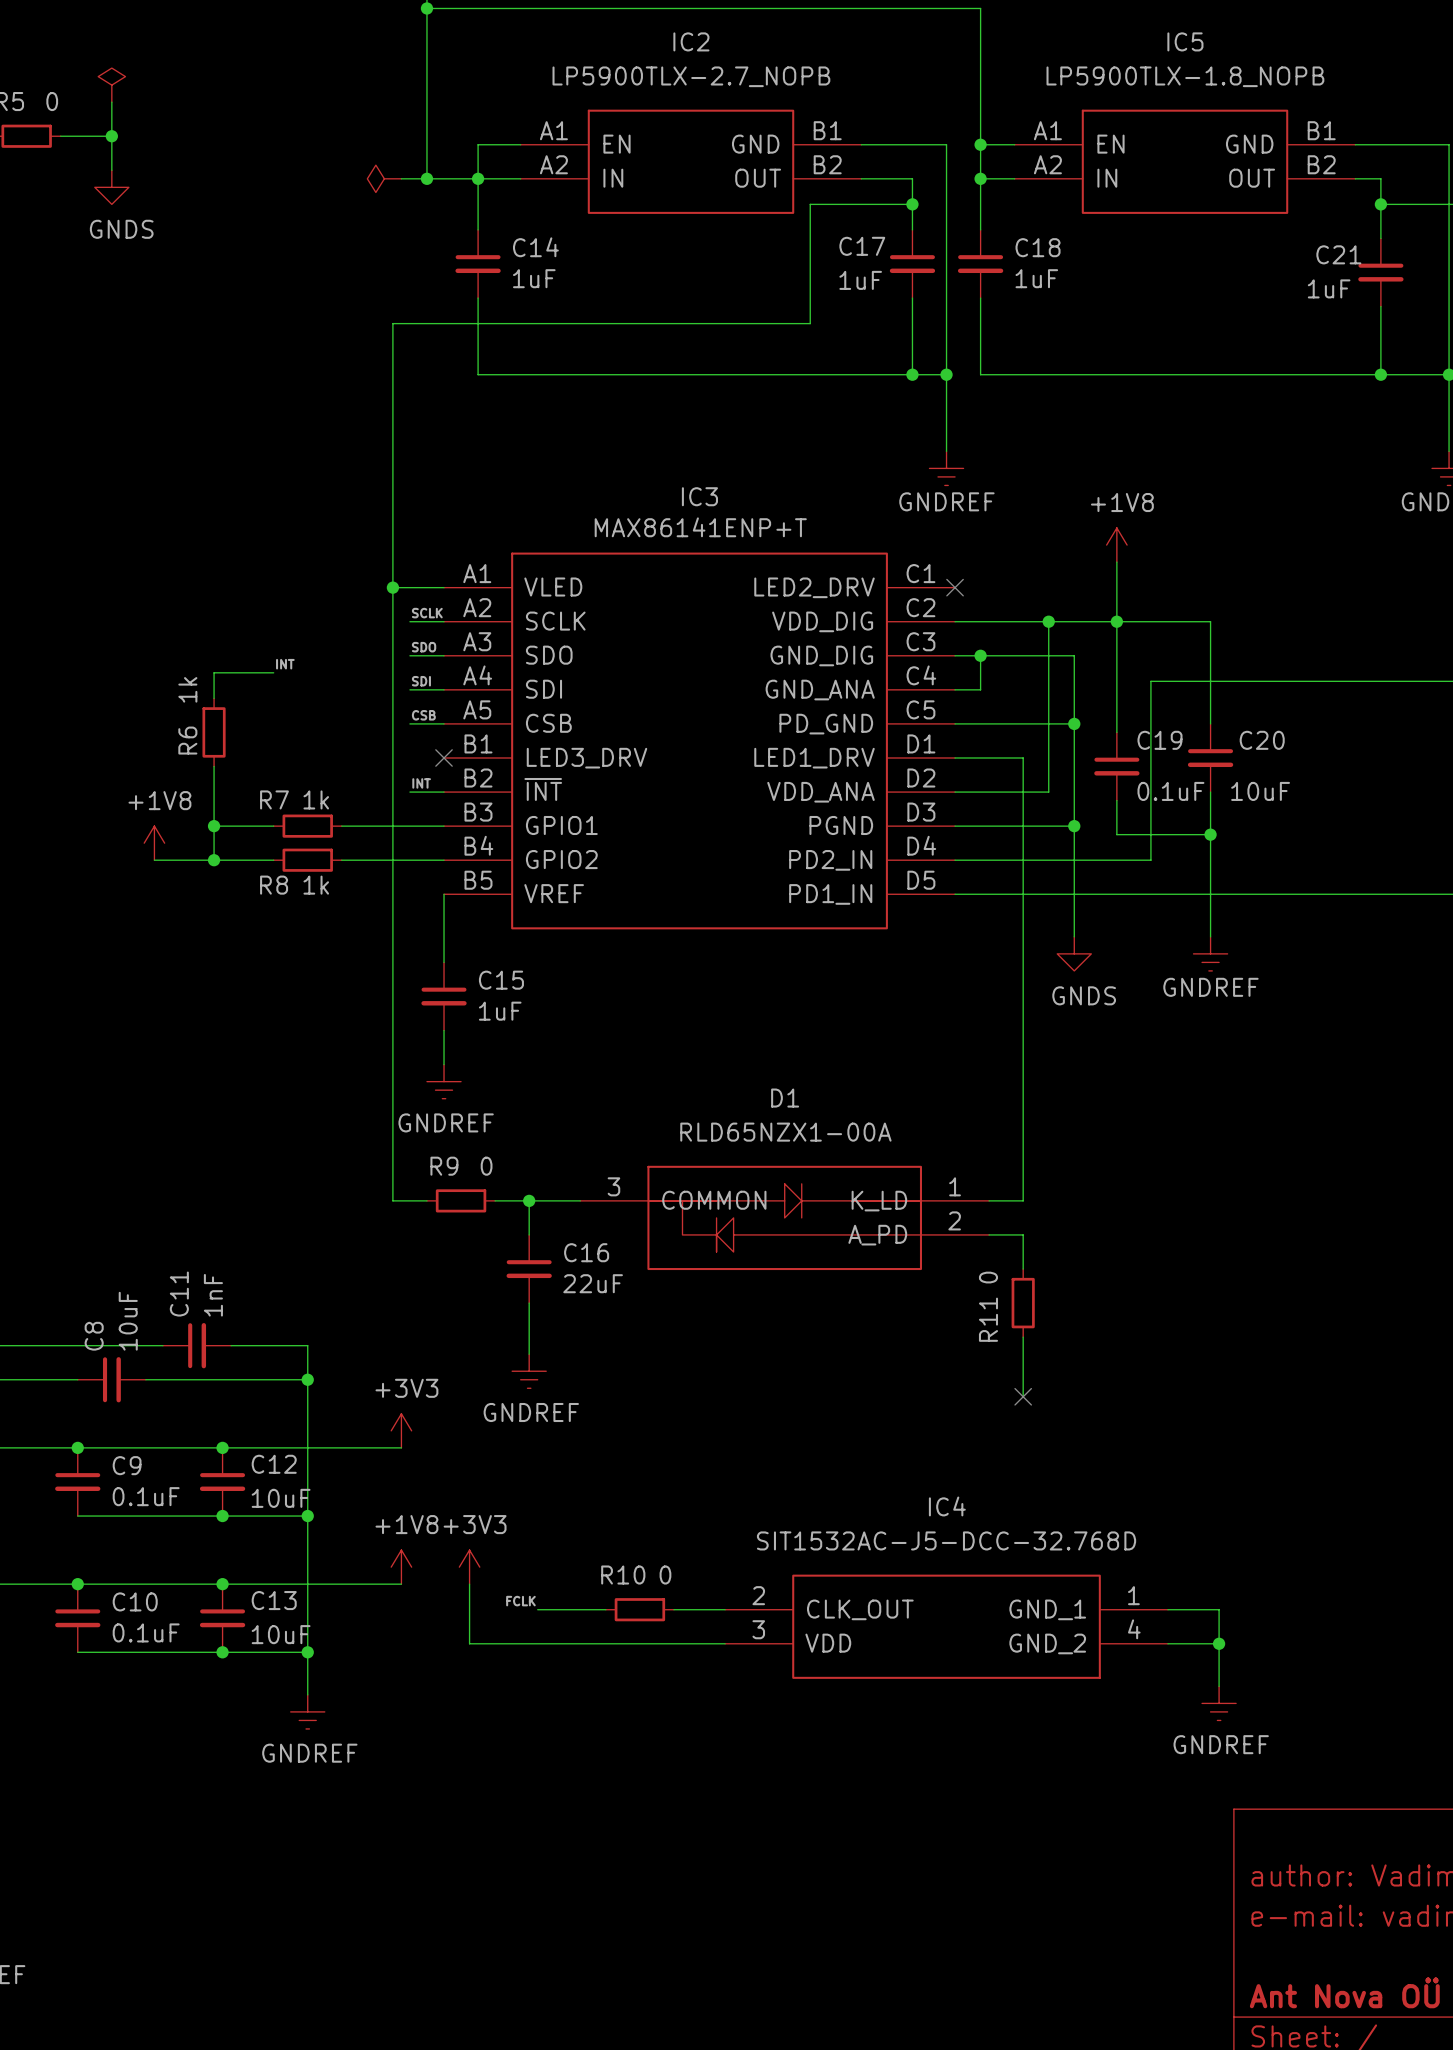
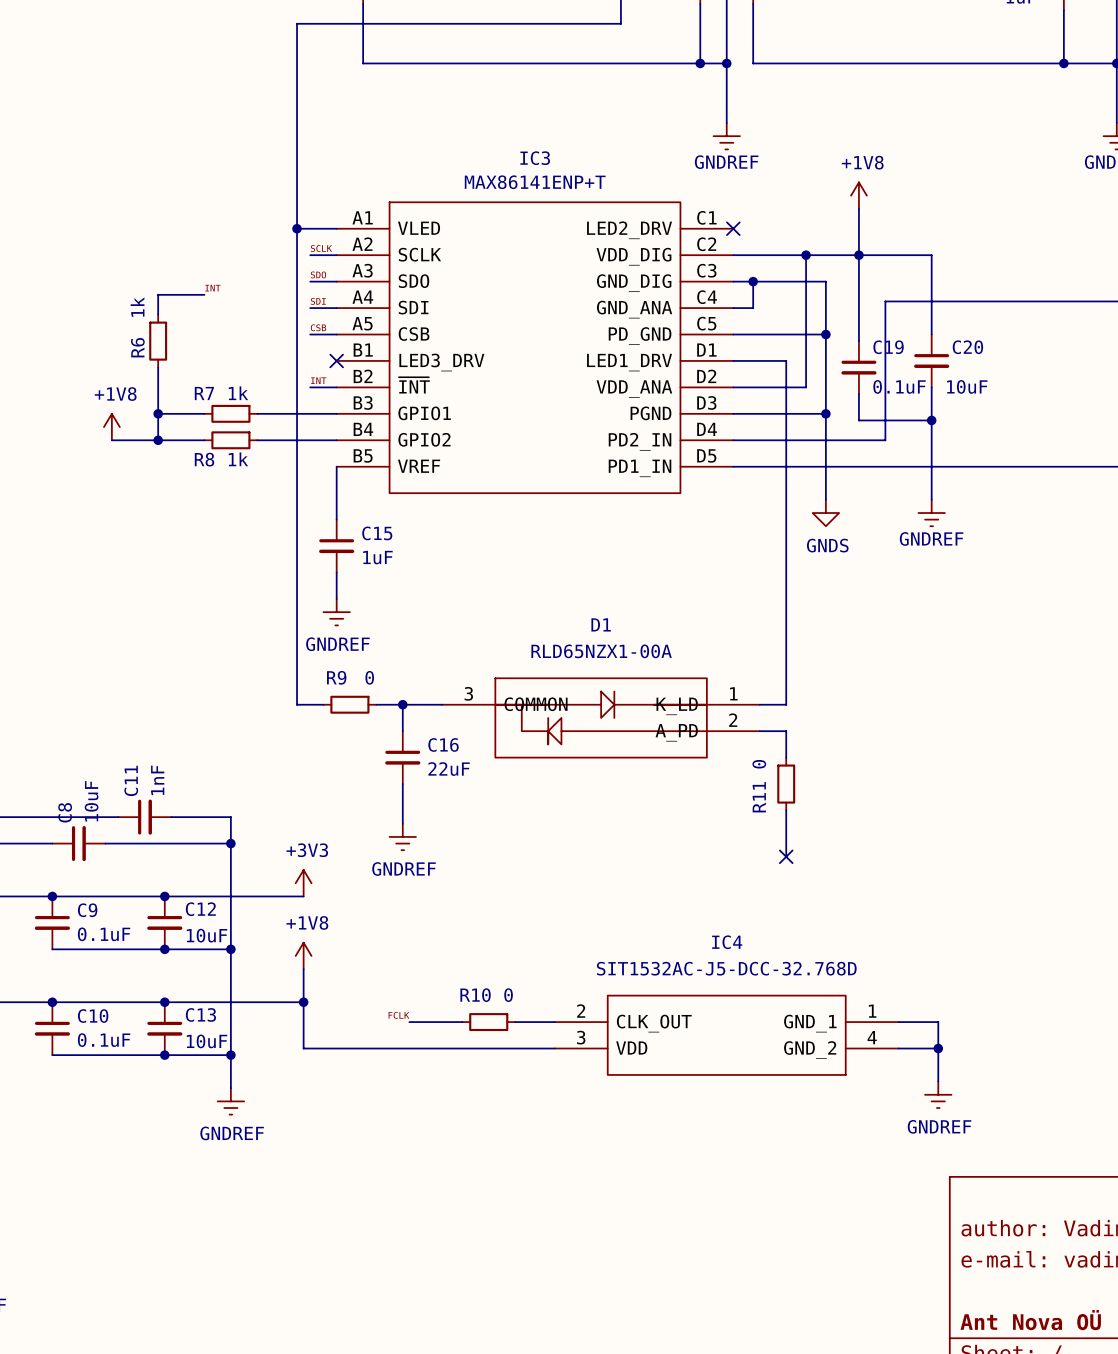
power symbol position: +1V8 (401, 1567) -> +1V8 (303, 955)
power symbol: +3V3 (469, 1567) -> none
junction: none -> (303, 1002)
wire: (469, 1584) (469, 1643) -> (303, 969) (303, 1048) (356, 1048)

